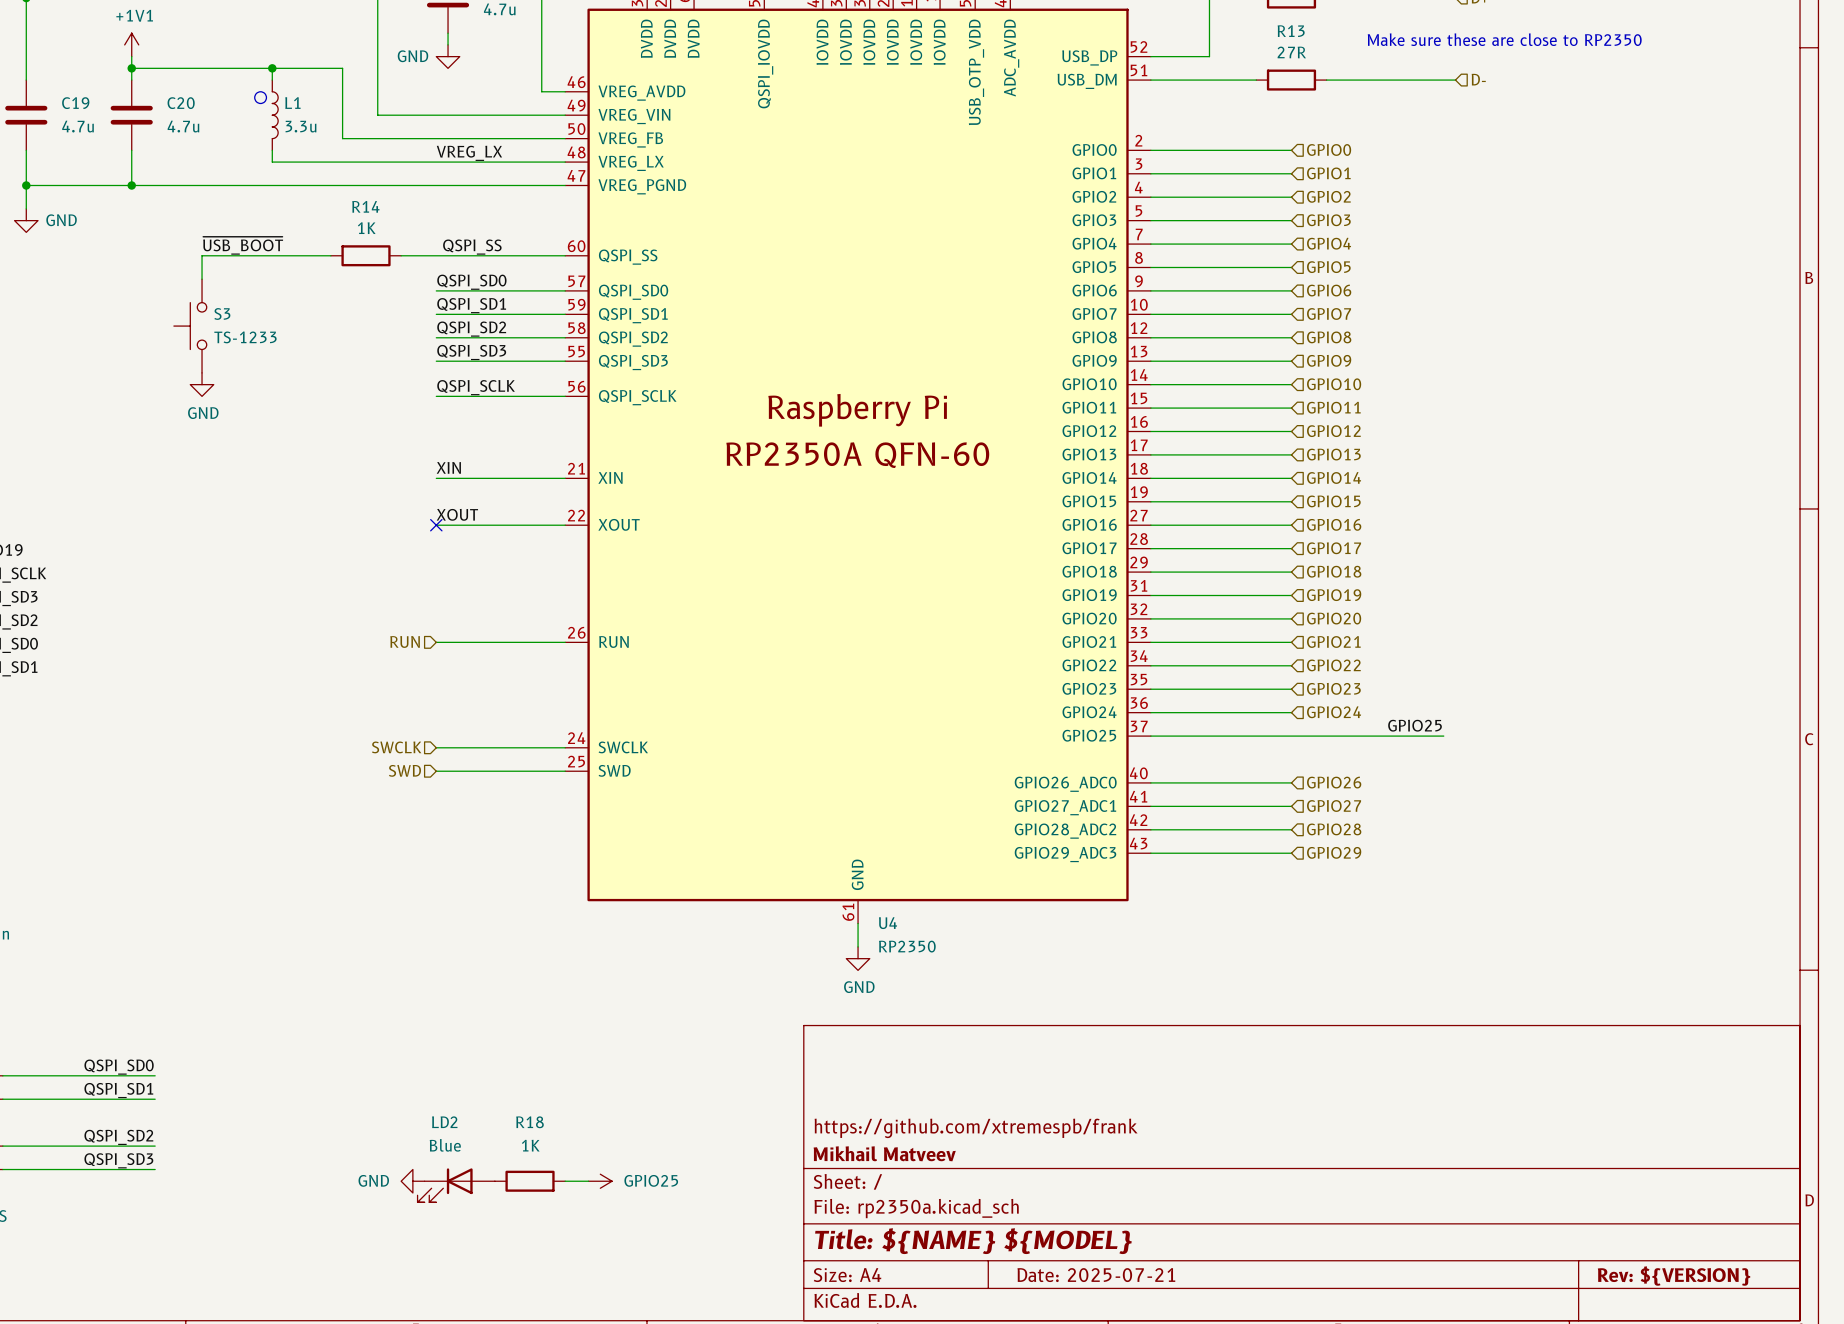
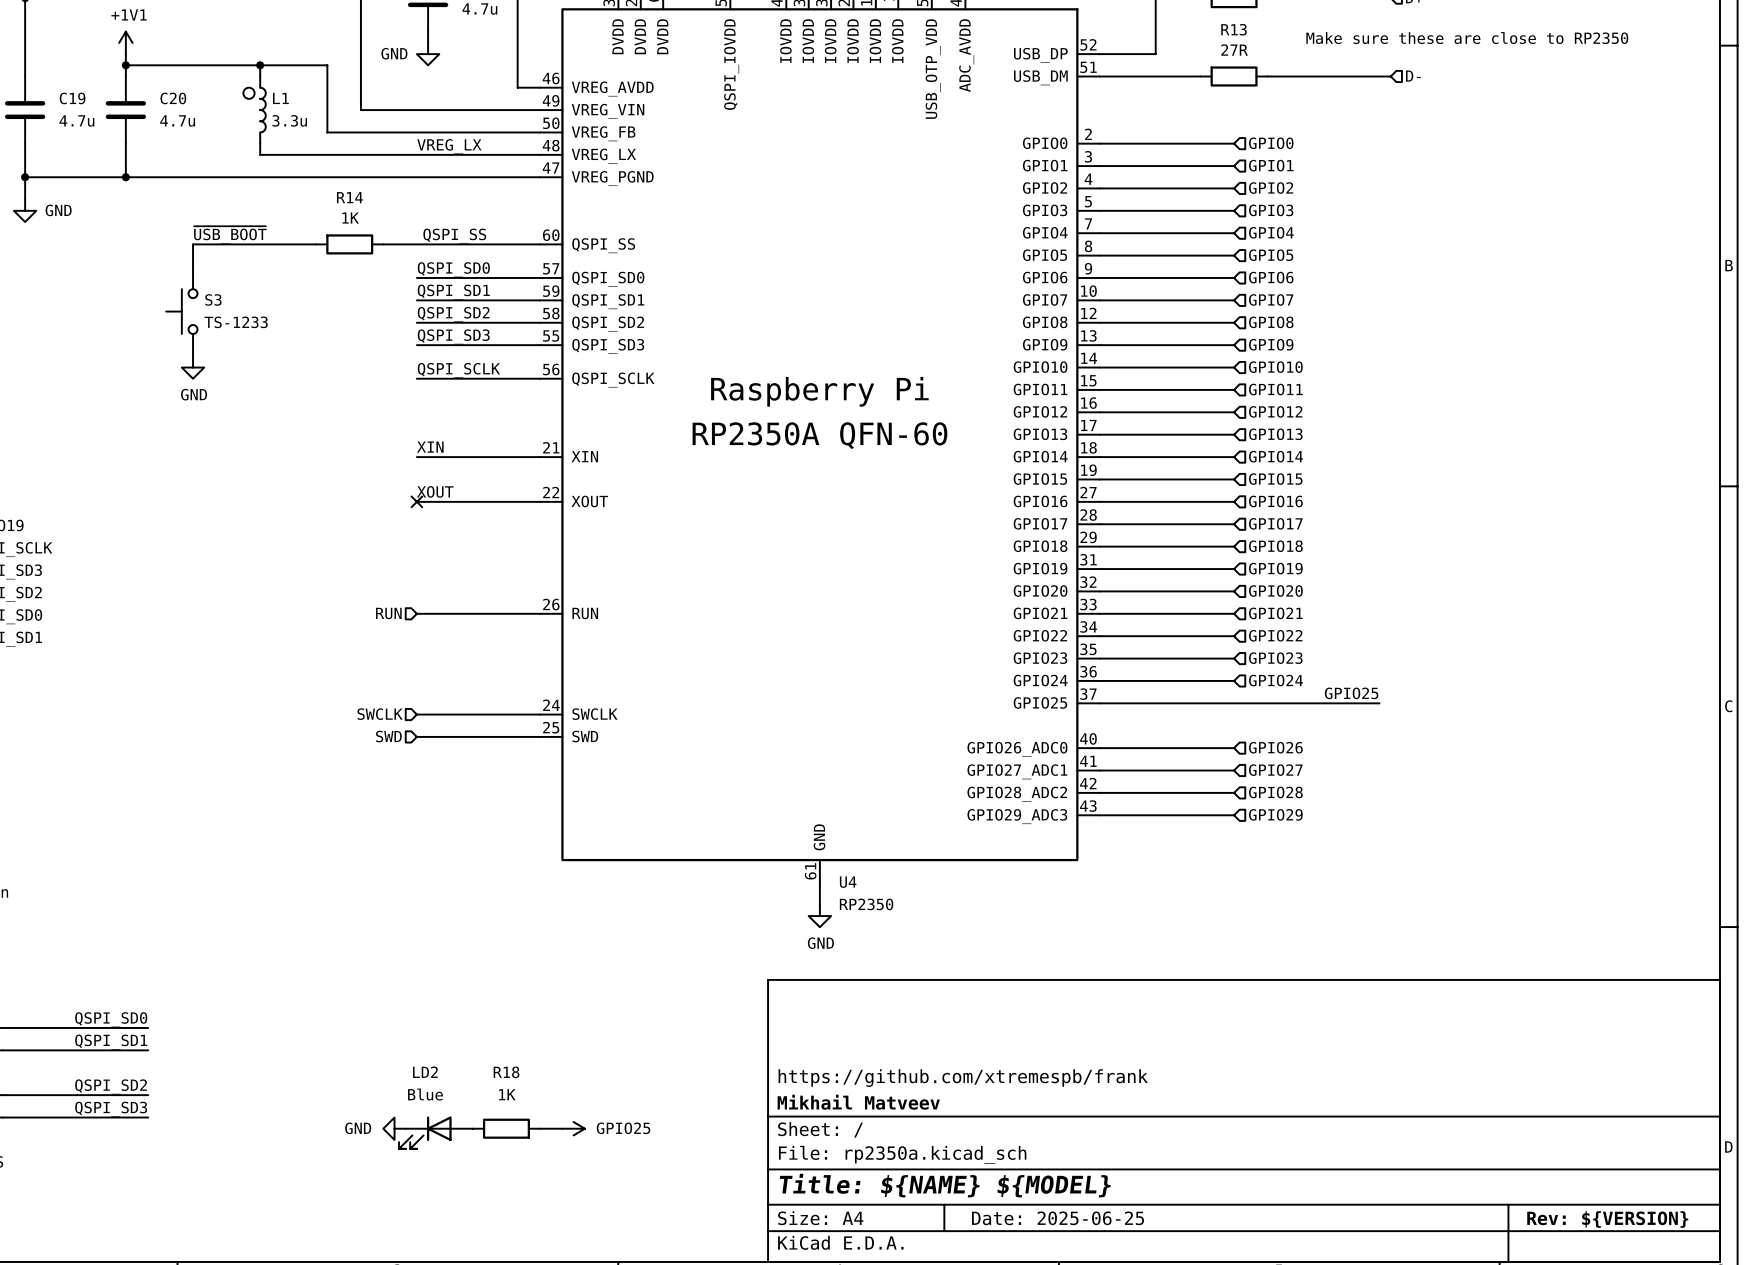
title block: Date: 2025-07-21 (1096, 1275) -> Date: 2025-06-25 (1058, 1218)

